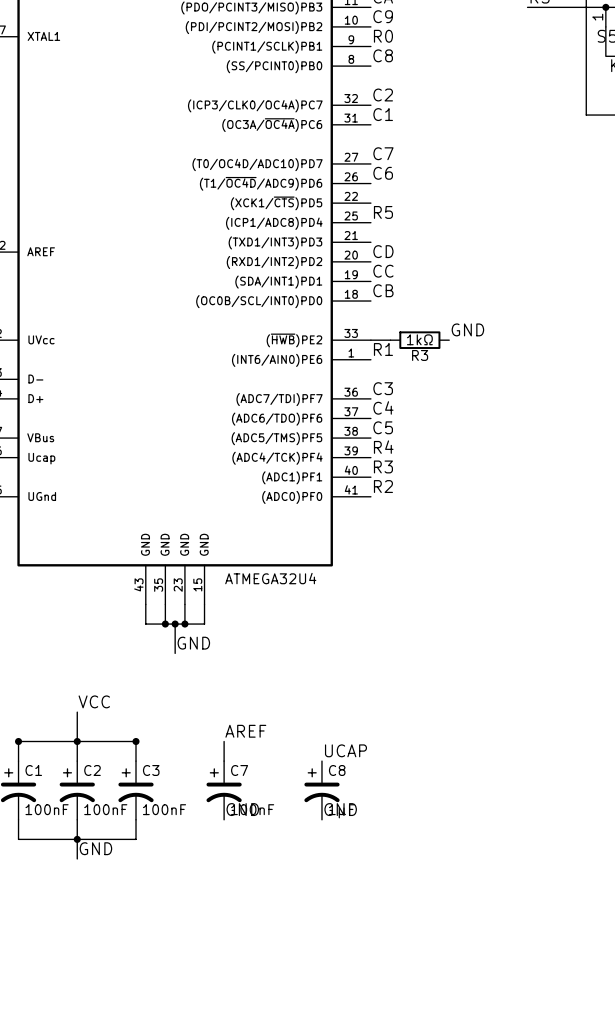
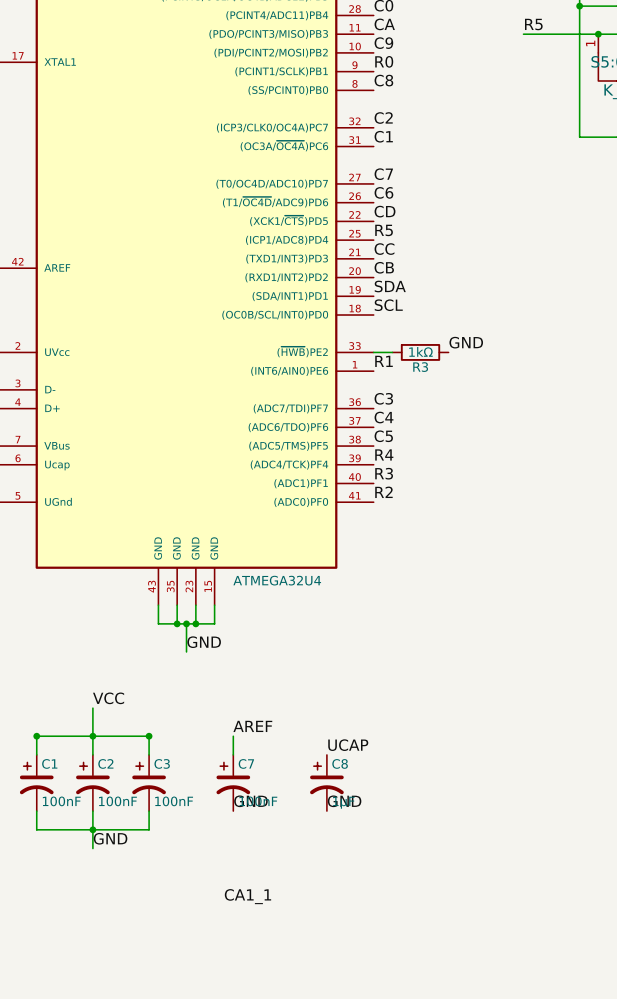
label: none -> CD (385, 211)
label: none -> CC (384, 249)
label: CD (383, 251) -> CB (384, 267)
label: CC (383, 271) -> SDA (390, 286)
label: CB (383, 290) -> SCL (388, 305)
label: none -> CA1_1 (247, 896)

